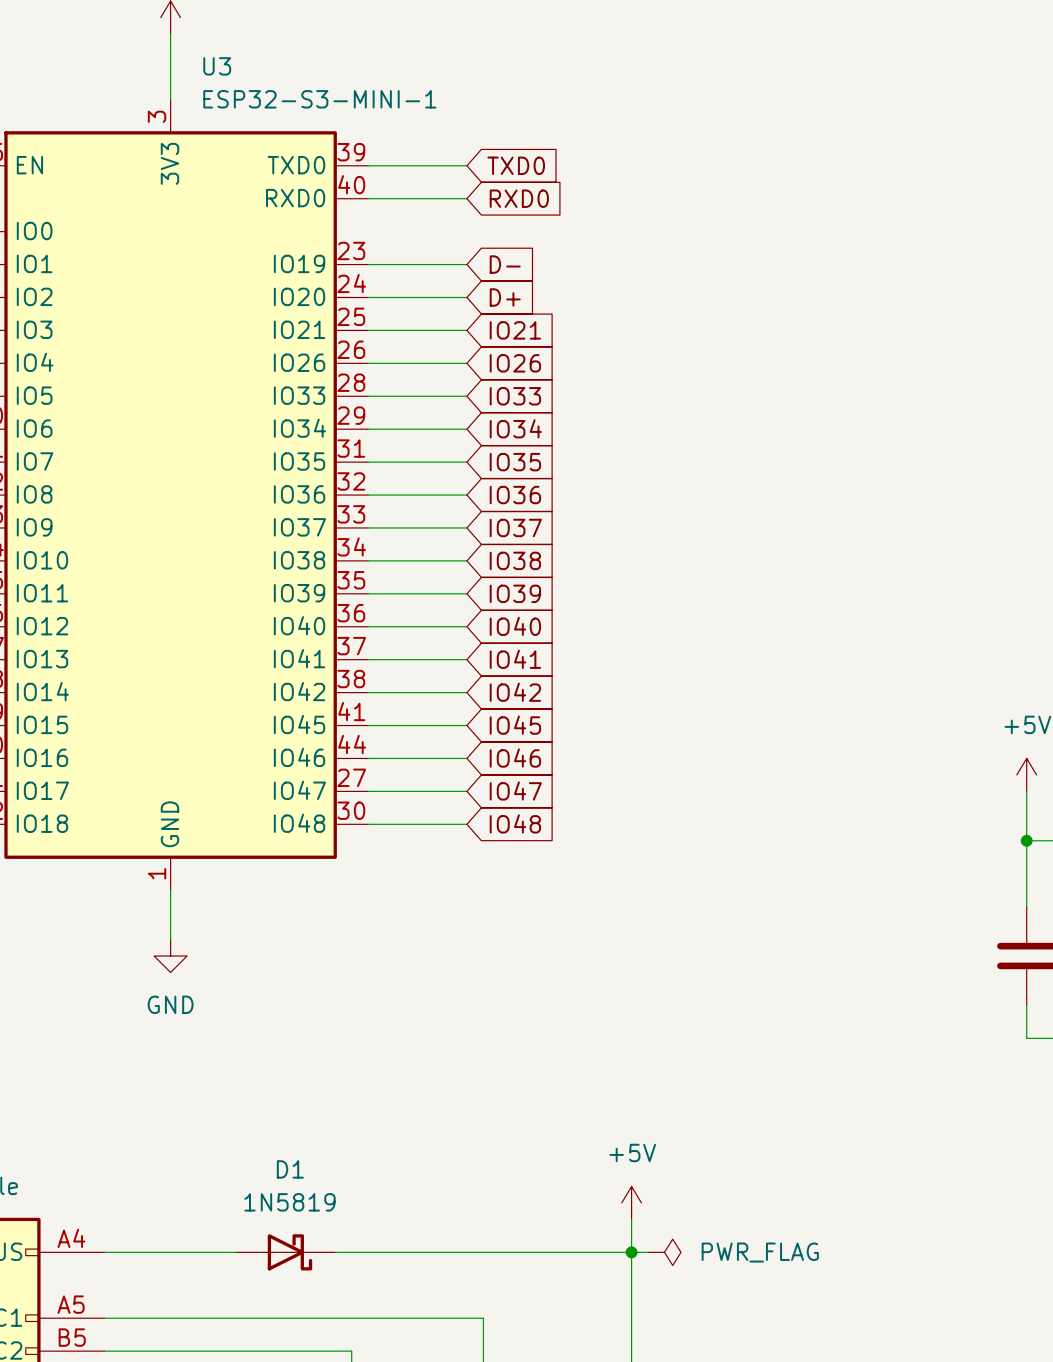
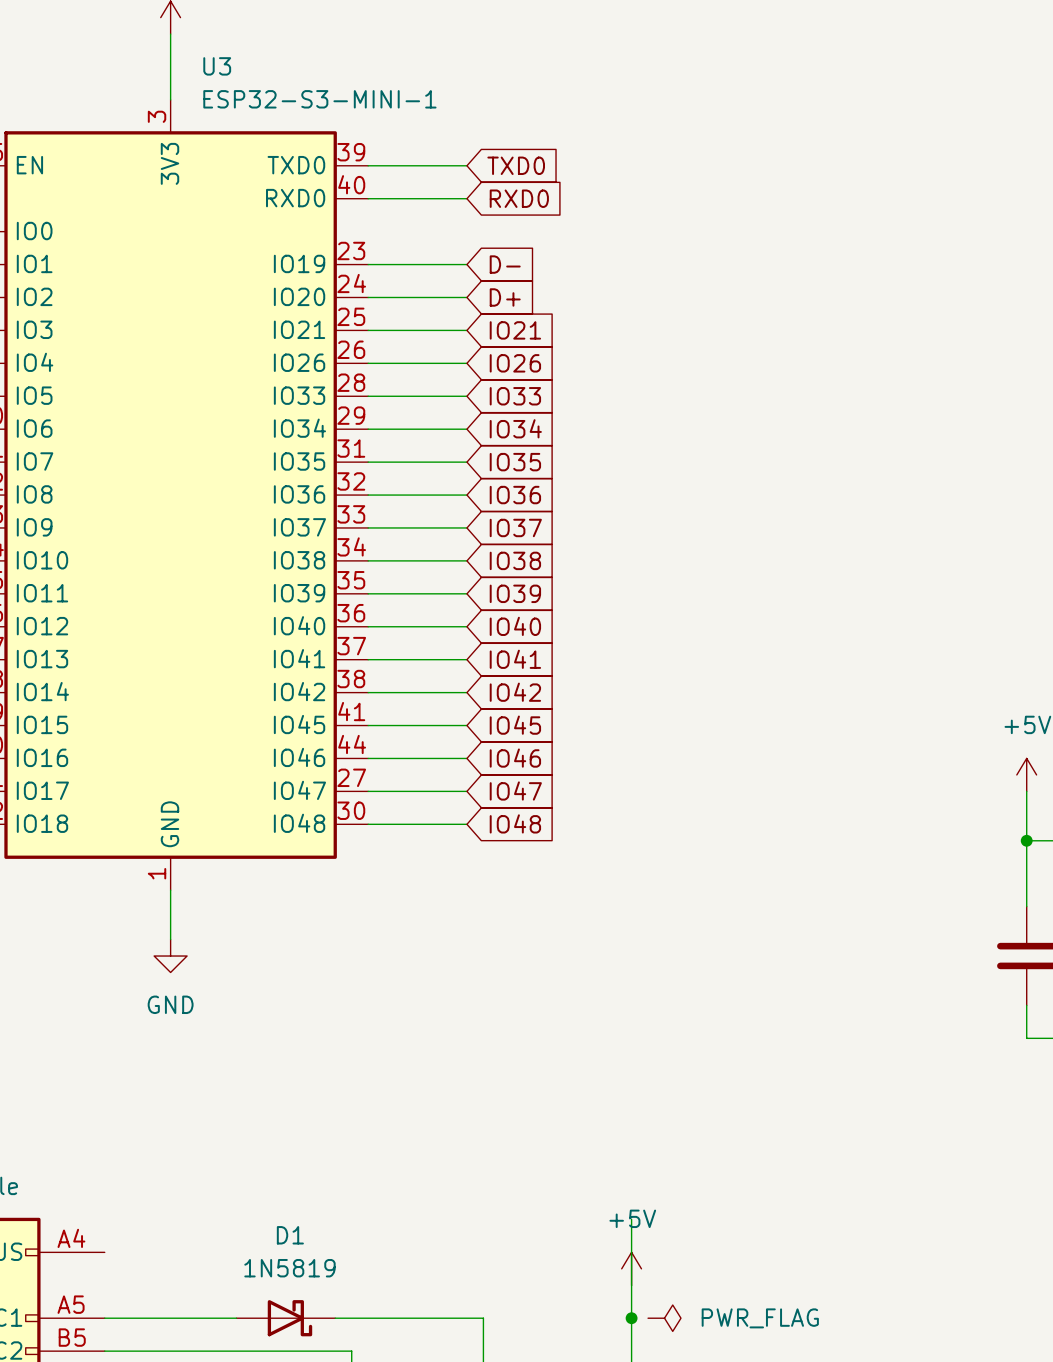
power symbol position: +5V (631, 1202) -> +5V (631, 1268)
wire: (104, 1252) (236, 1252) -> none
D1 position: (285, 1252) -> (285, 1318)
wire: (335, 1252) (648, 1252) -> none
junction position: (631, 1252) -> (631, 1318)
power symbol position: PWR_FLAG (664, 1252) -> PWR_FLAG (664, 1318)

